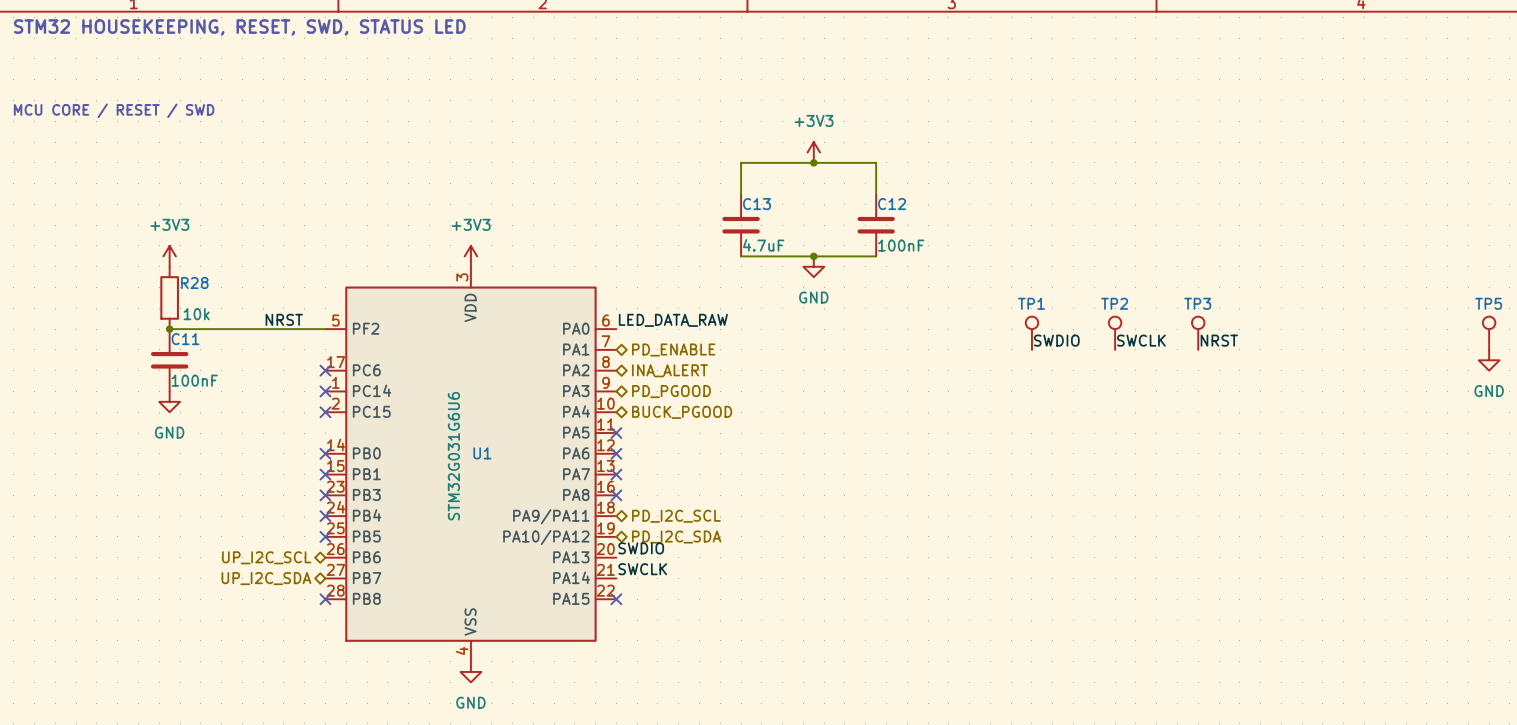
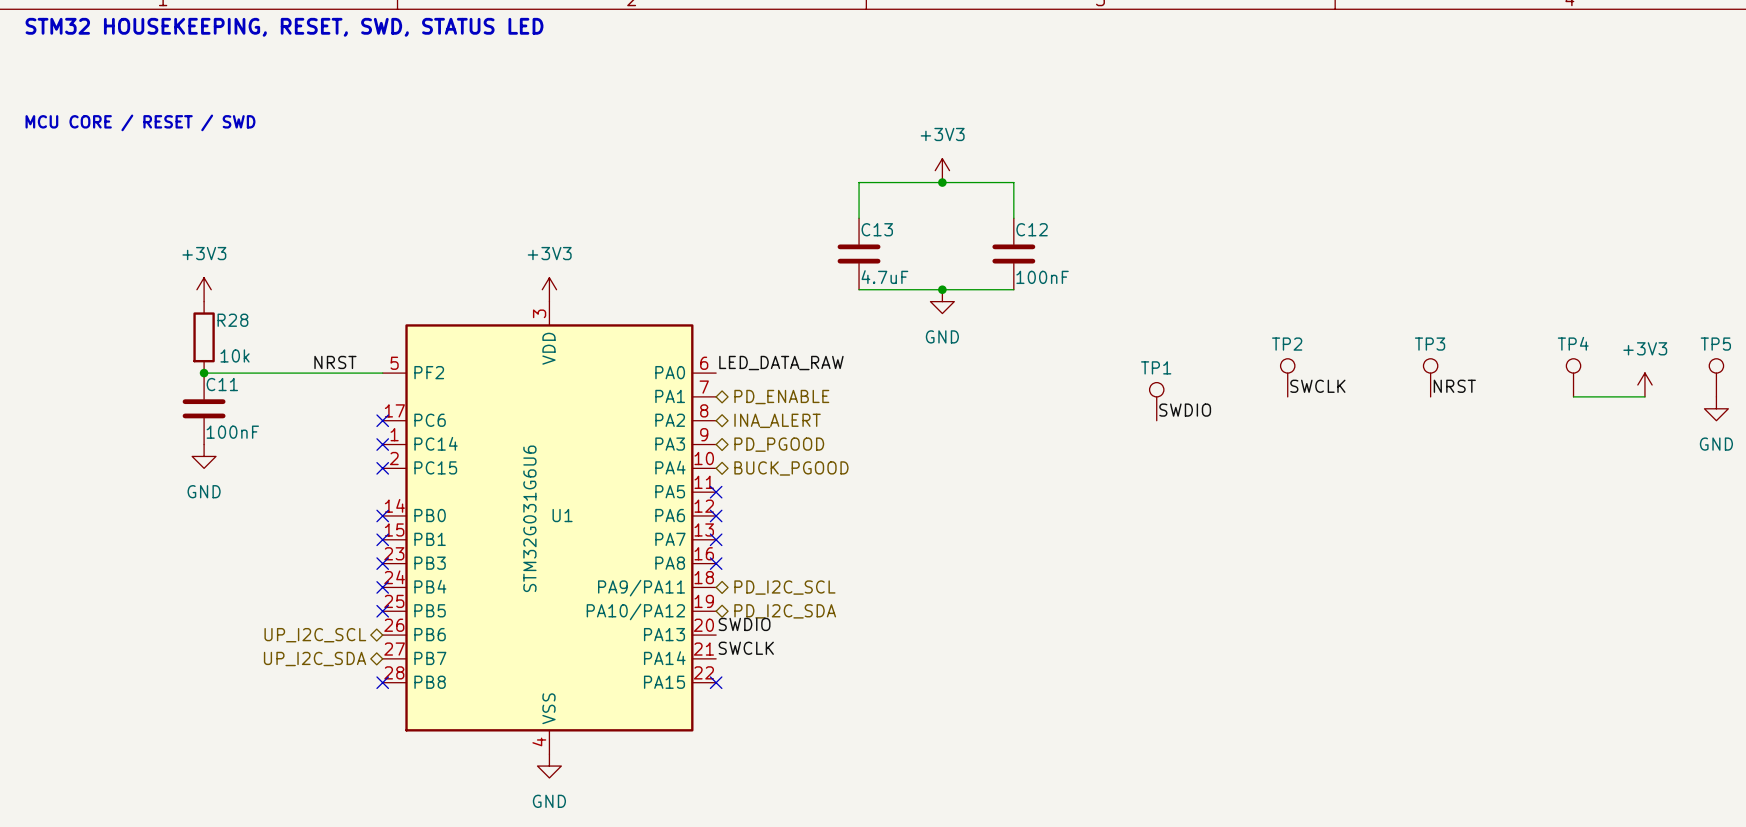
TP1 position: (1031, 333) -> (1156, 401)
TP3 position: (1198, 333) -> (1430, 377)
TP4: none -> (1573, 377)
power symbol: none -> +3V3 (1644, 384)
label position: SWDIO (1056, 340) -> SWDIO (1185, 410)
label position: NRST (1219, 340) -> NRST (1454, 386)
wire: none -> (1573, 396) (1644, 396)

